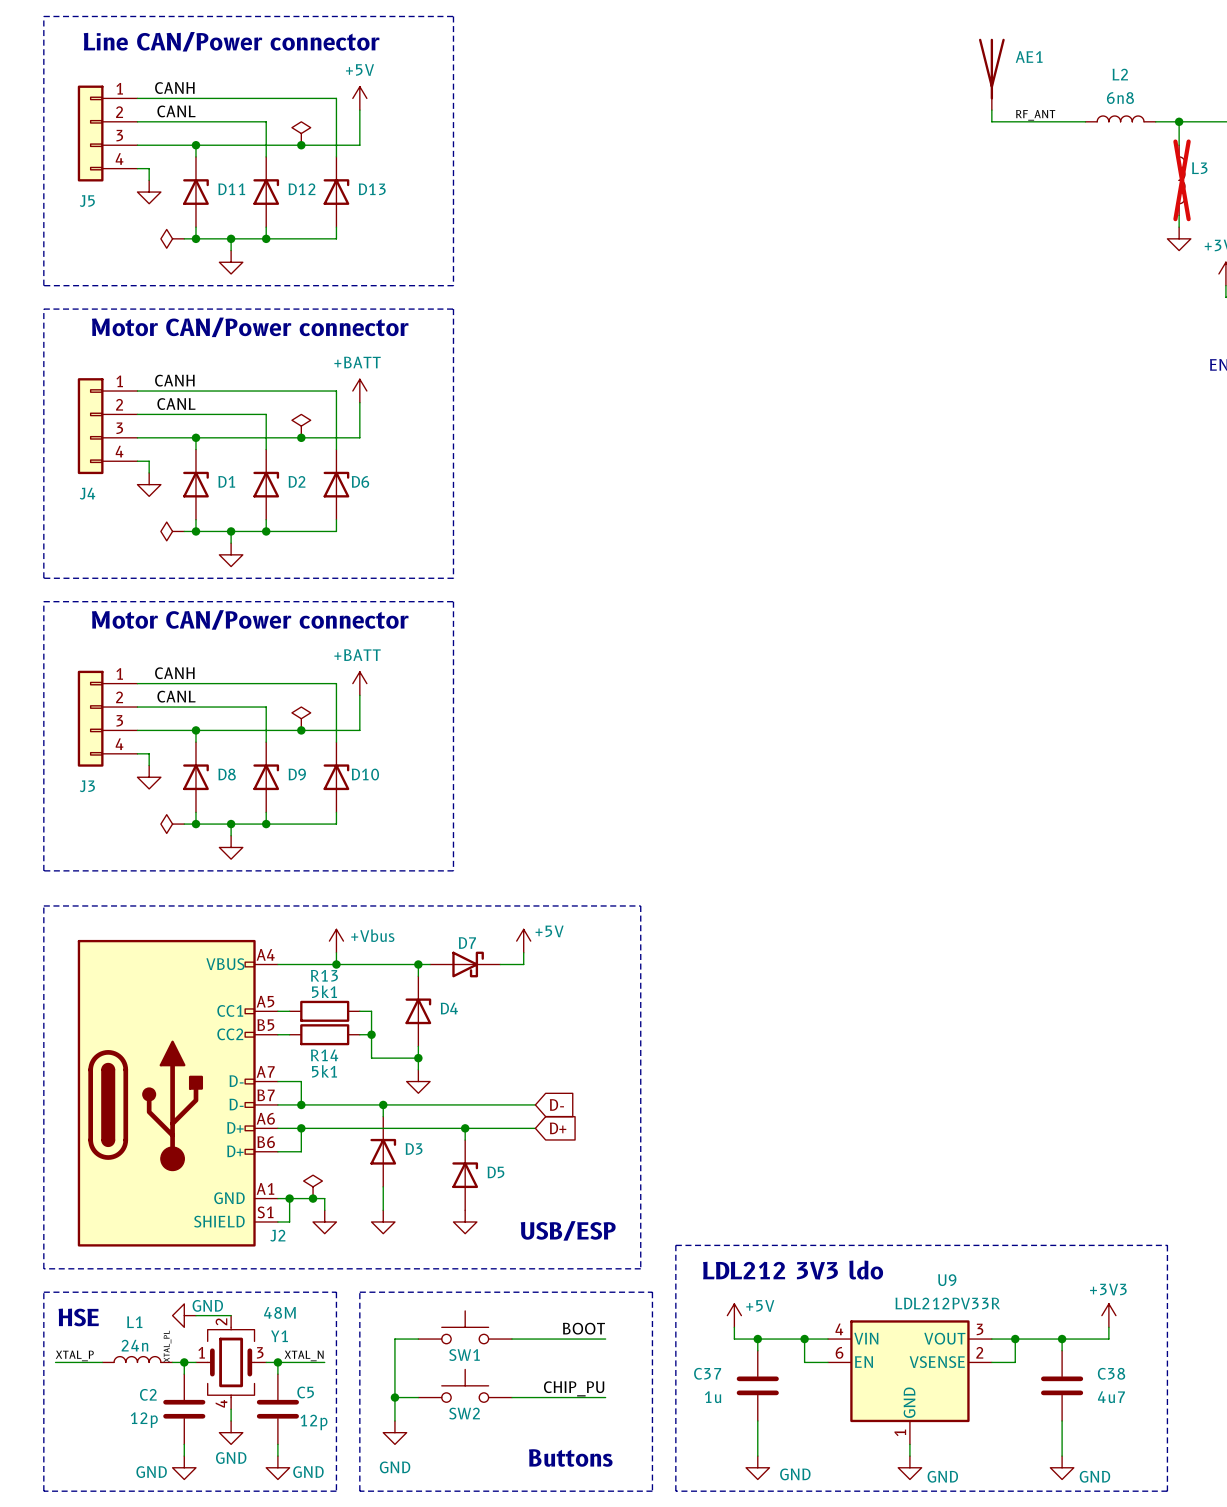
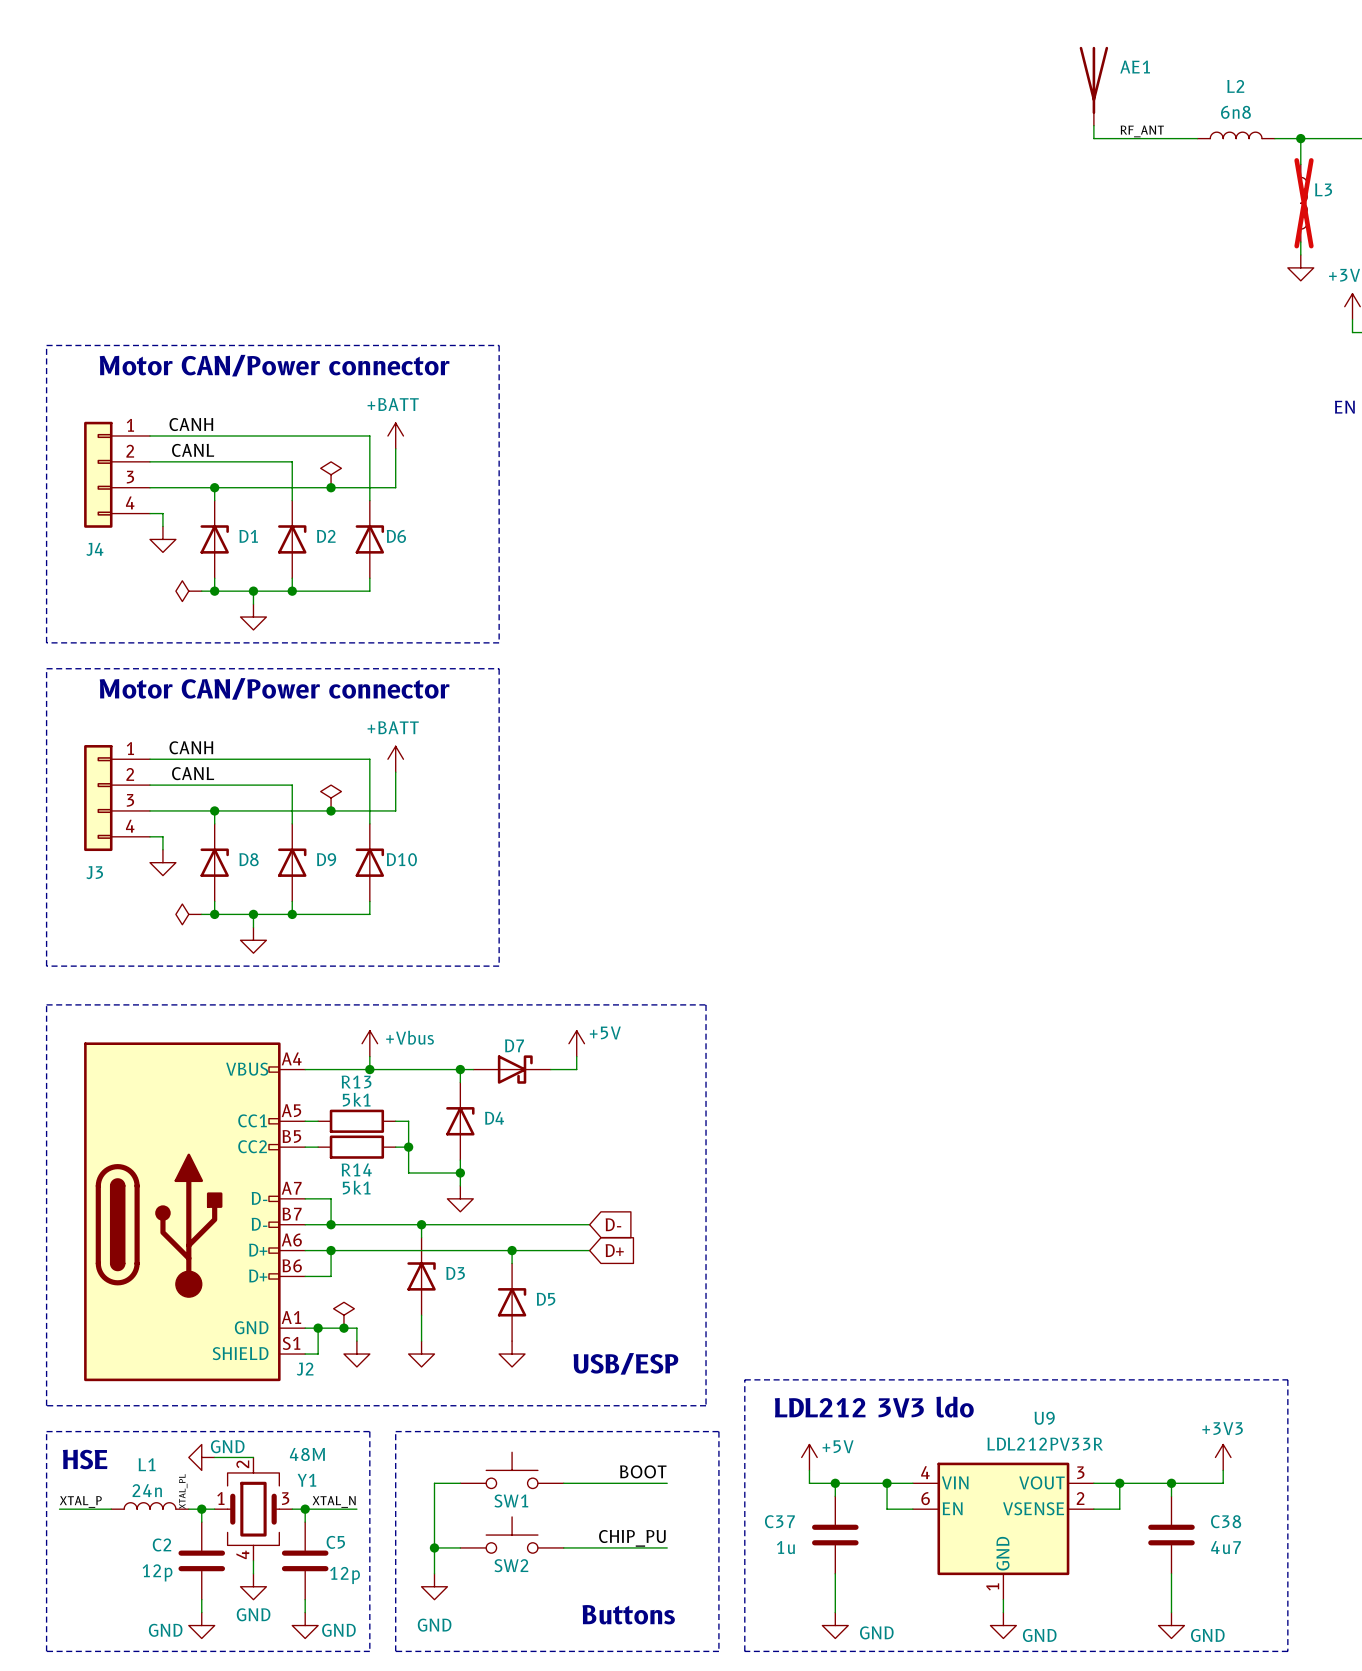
line: (43, 16) (453, 16) (453, 285) (43, 285) (43, 16) -> none
text: Line CAN/Power connector (231, 41) -> none
label: CANH (174, 88) -> none
wire: (137, 98) (336, 98) (336, 156) -> none
power symbol: +5V (359, 98) -> none
wire: (359, 110) (359, 145) (137, 145) -> none
label: CANL (176, 111) -> none
wire: (137, 121) (266, 121) (266, 156) -> none
J5: (107, 133) -> none
power symbol: (301, 133) -> none
wire: (195, 145) (195, 156) -> none
junction: (195, 145) -> none
junction: (301, 145) -> none
wire: (137, 168) (149, 168) (149, 180) -> none
power symbol: (149, 192) -> none
D11: (195, 192) -> none
D12: (266, 192) -> none
D13: (336, 192) -> none
wire: (195, 227) (195, 238) -> none
wire: (266, 227) (266, 238) -> none
wire: (336, 227) (336, 238) (184, 238) -> none
power symbol: (172, 238) -> none
junction: (195, 238) -> none
wire: (231, 238) (231, 250) -> none
junction: (231, 238) -> none
junction: (266, 238) -> none
power symbol: (231, 262) -> none

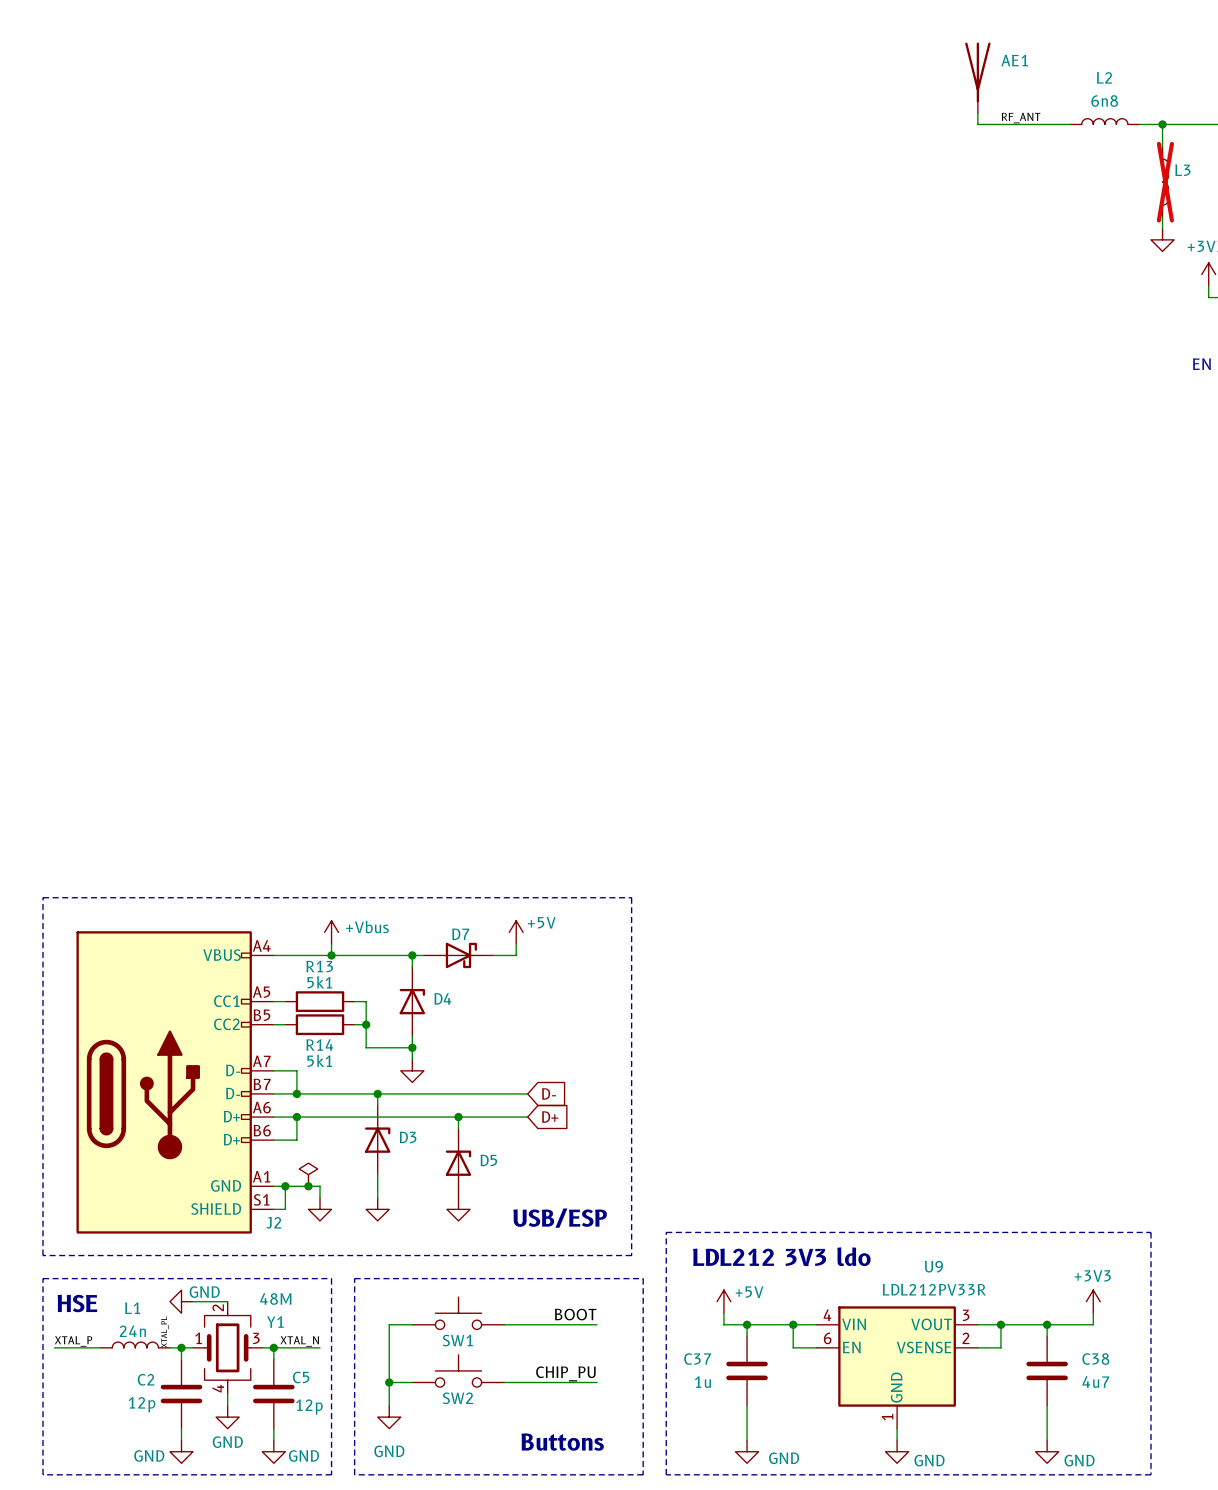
line: (46, 345) (46, 642) (499, 642) (499, 345) (46, 345) -> none
text: Motor CAN/Power connector (274, 365) -> none
label: CANH (191, 424) -> none
wire: (150, 436) (369, 436) (369, 500) -> none
power symbol: +BATT (395, 436) -> none
wire: (395, 448) (395, 487) (150, 487) -> none
label: CANL (193, 450) -> none
wire: (150, 461) (292, 461) (292, 500) -> none
J4: (117, 474) -> none
power symbol: (331, 474) -> none
wire: (214, 487) (214, 500) -> none
junction: (214, 487) -> none
junction: (331, 487) -> none
wire: (150, 513) (162, 513) (162, 526) -> none
power symbol: (162, 539) -> none
D1: (214, 539) -> none
D2: (292, 539) -> none
D6: (369, 539) -> none
wire: (214, 578) (214, 591) -> none
wire: (292, 578) (292, 591) -> none
wire: (369, 578) (369, 591) (201, 591) -> none
power symbol: (188, 591) -> none
junction: (214, 591) -> none
wire: (253, 591) (253, 604) -> none
junction: (253, 591) -> none
junction: (292, 591) -> none
power symbol: (253, 617) -> none
line: (46, 668) (499, 668) (499, 966) (46, 966) (46, 668) -> none
text: Motor CAN/Power connector (274, 688) -> none
label: CANH (191, 747) -> none
wire: (150, 759) (369, 759) (369, 823) -> none
power symbol: +BATT (395, 759) -> none
wire: (395, 772) (395, 810) (150, 810) -> none
label: CANL (193, 773) -> none
wire: (150, 785) (292, 785) (292, 823) -> none
J3: (117, 798) -> none
power symbol: (331, 798) -> none
wire: (214, 810) (214, 823) -> none
junction: (214, 810) -> none
junction: (331, 810) -> none
wire: (150, 836) (162, 836) (162, 849) -> none
power symbol: (162, 862) -> none
D8: (214, 862) -> none
D9: (292, 862) -> none
D10: (369, 862) -> none
wire: (214, 901) (214, 914) -> none
wire: (292, 901) (292, 914) -> none
wire: (369, 901) (369, 914) (201, 914) -> none
power symbol: (188, 914) -> none
junction: (214, 914) -> none
wire: (253, 914) (253, 927) -> none
junction: (253, 914) -> none
junction: (292, 914) -> none
power symbol: (253, 940) -> none

